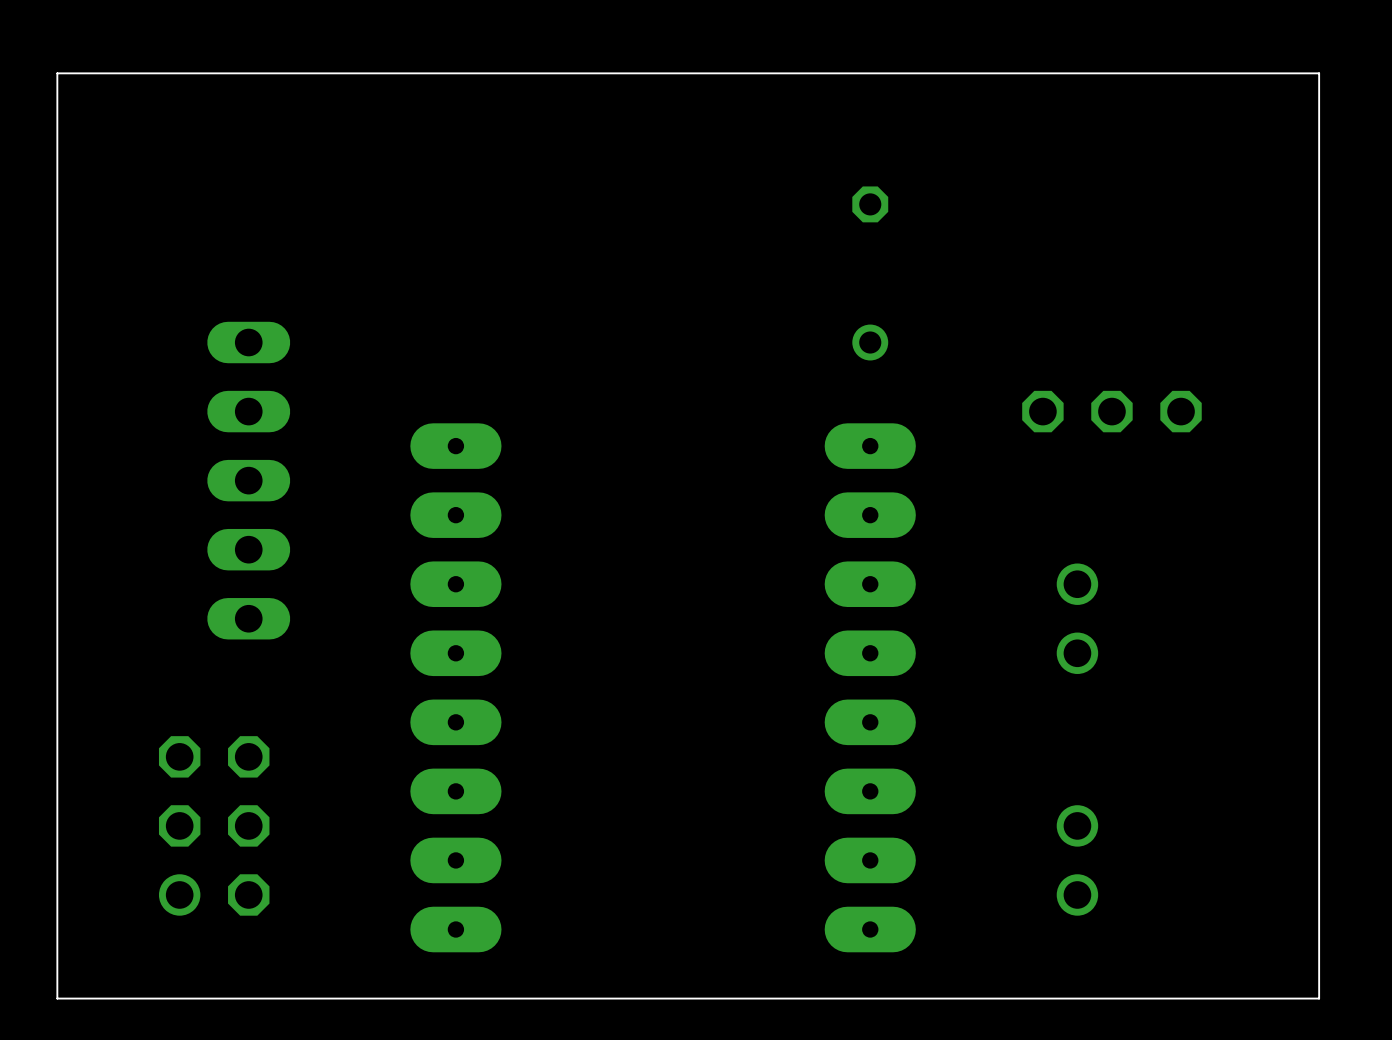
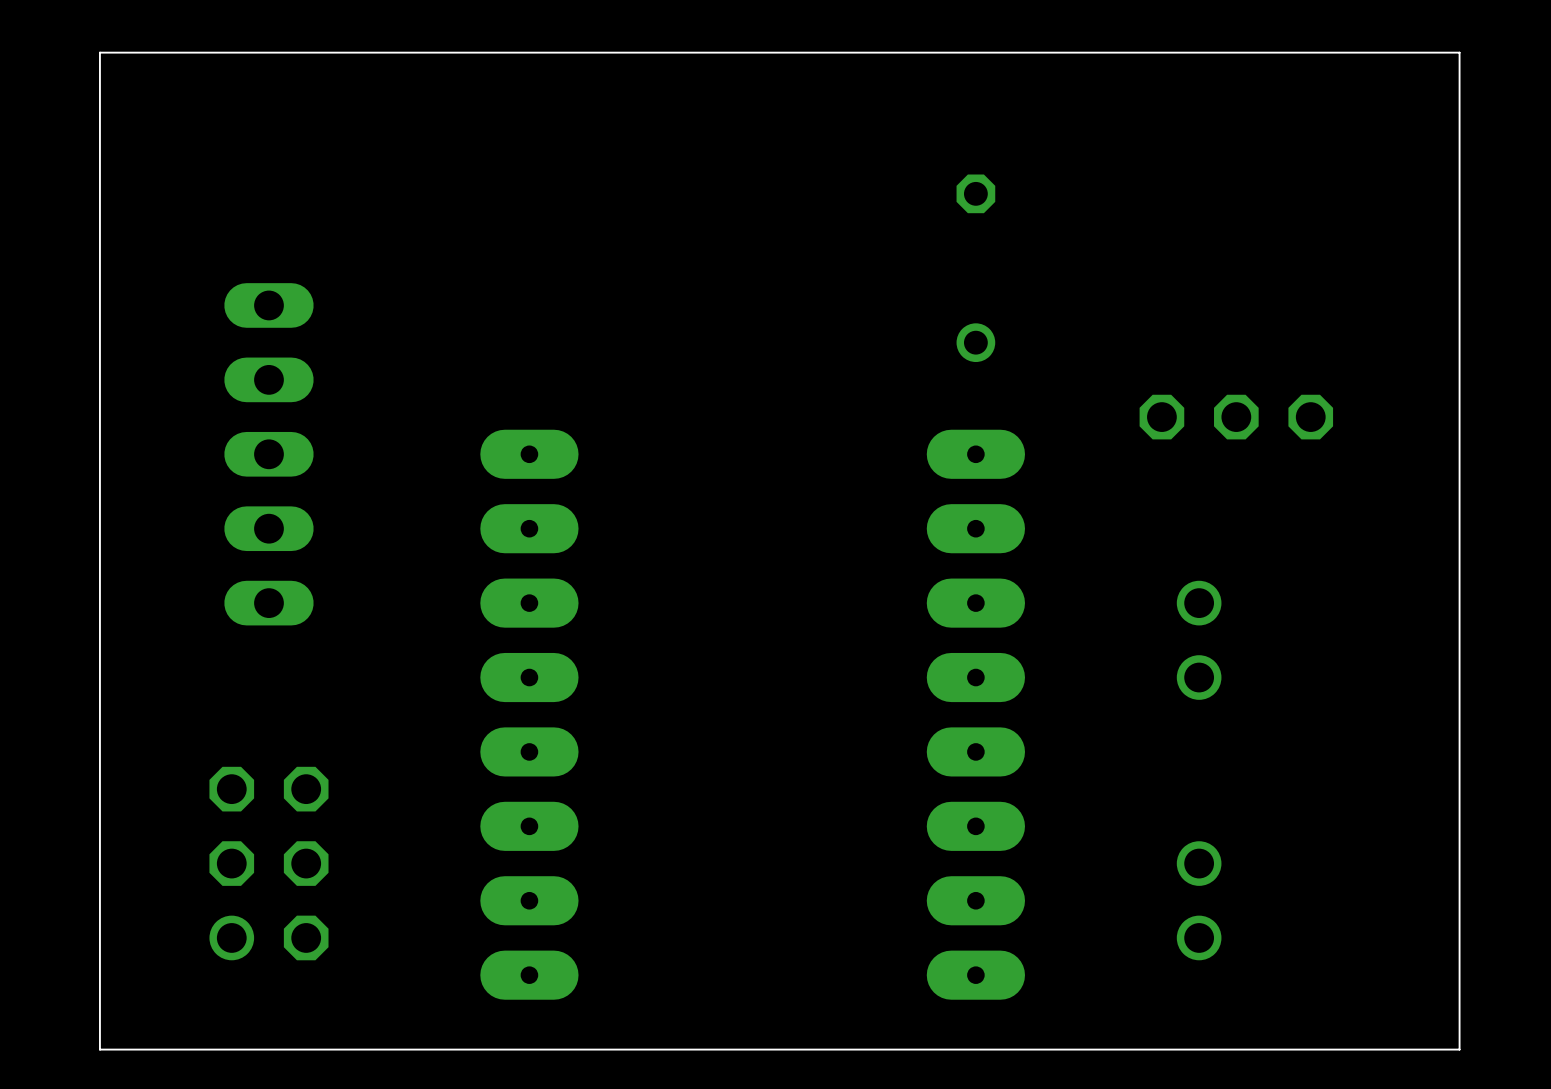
part position: (248, 480) -> (268, 454)

